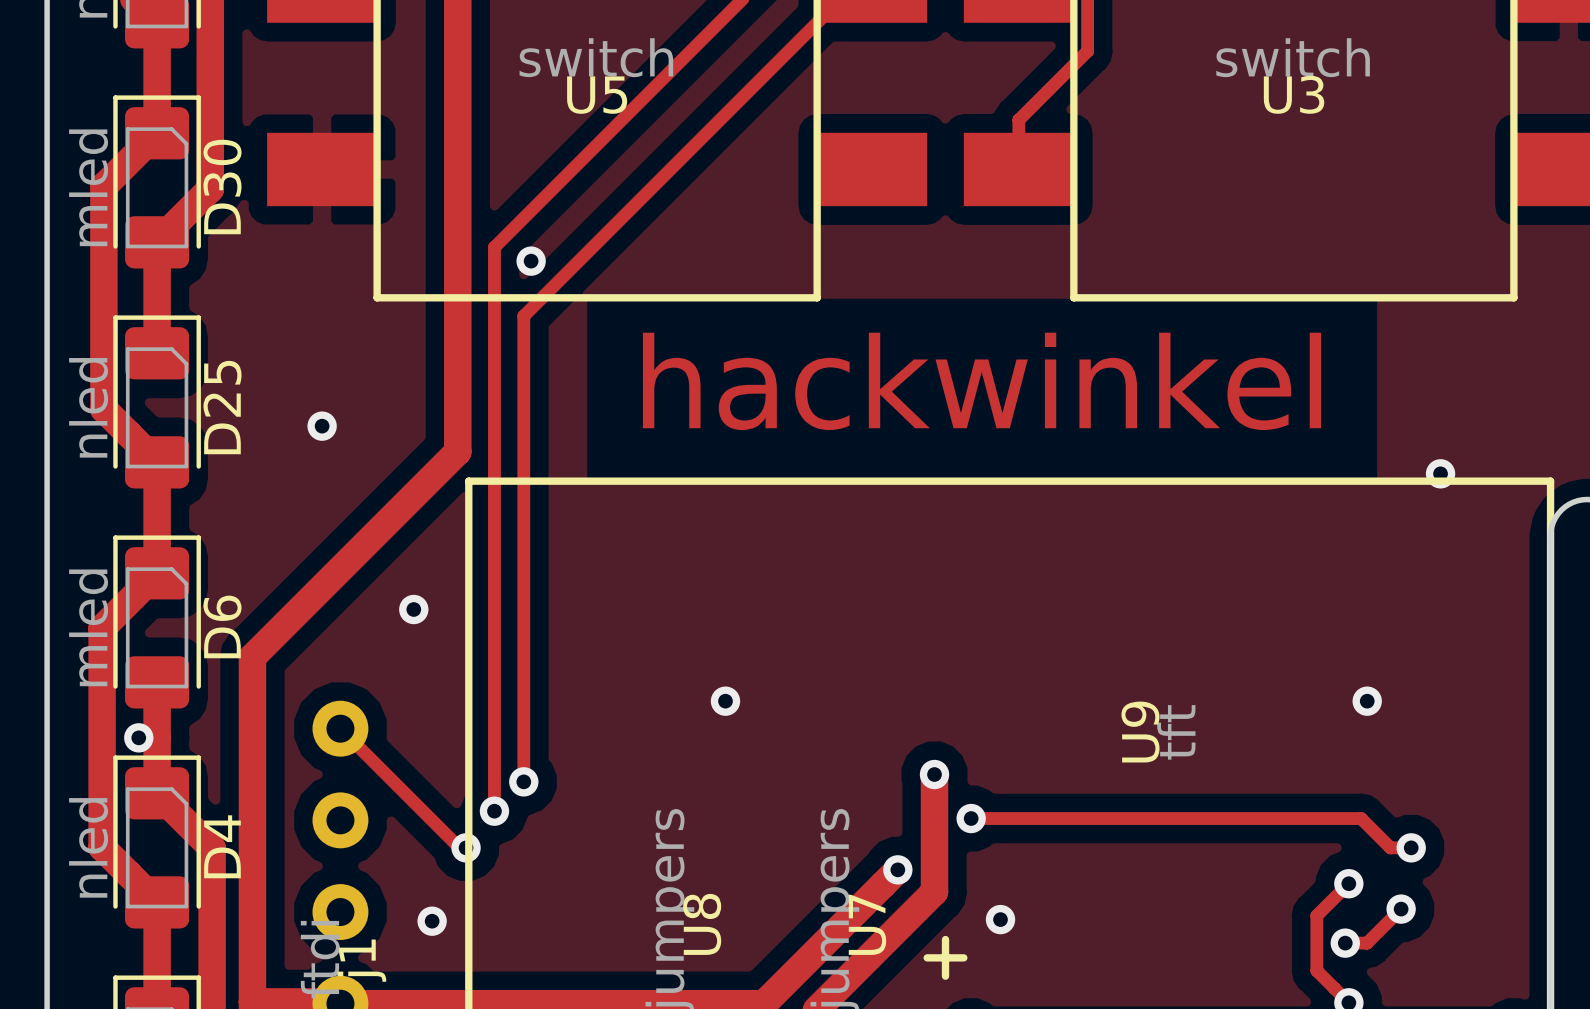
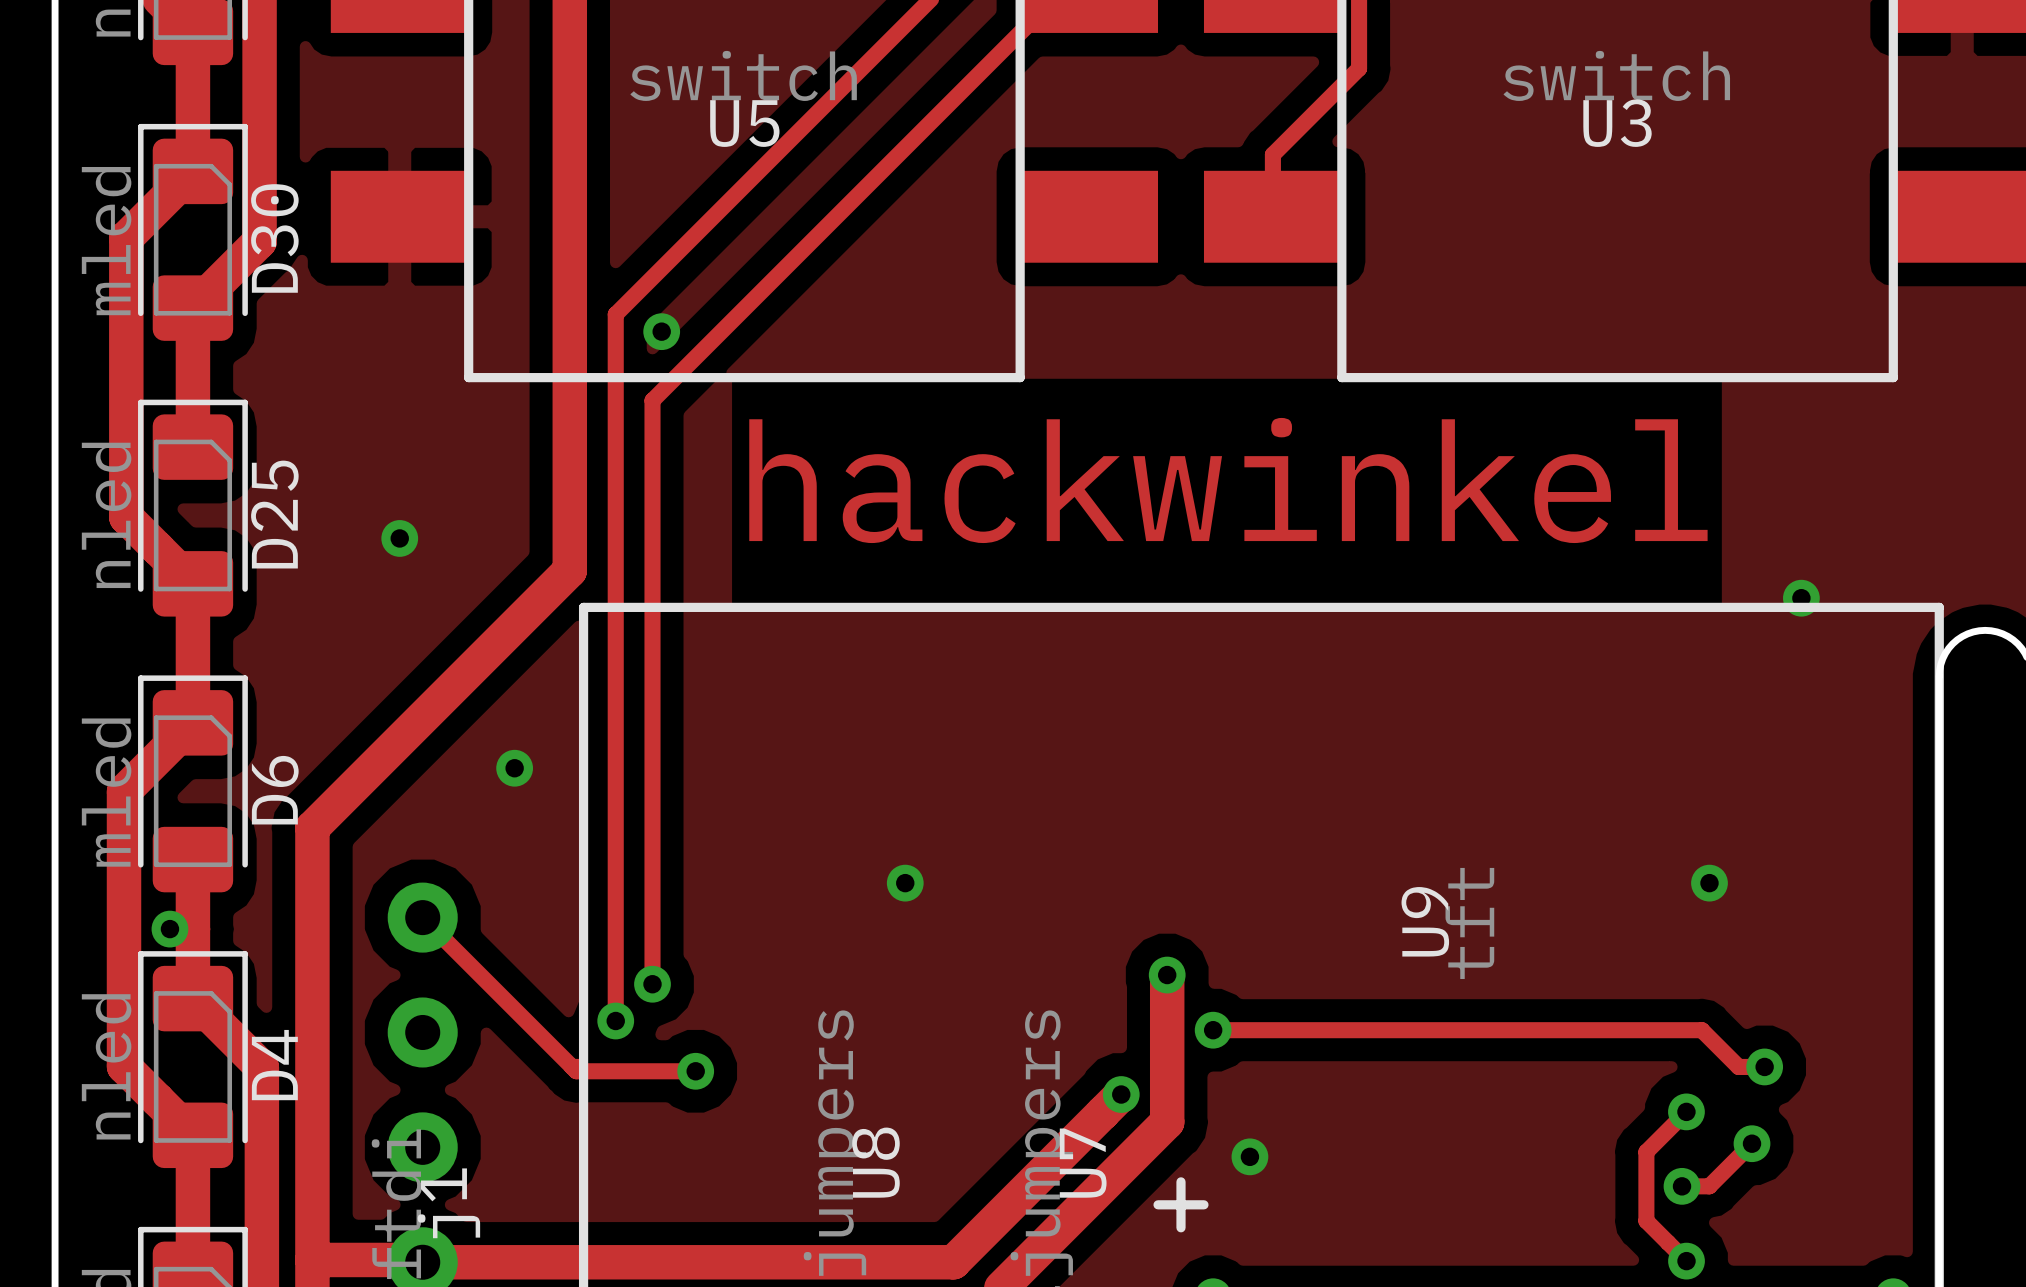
track: none -> (572, 1066) (576, 1071) (695, 1071)
via: (466, 847) -> none
via: none -> (695, 1071)
via: (432, 921) -> none

